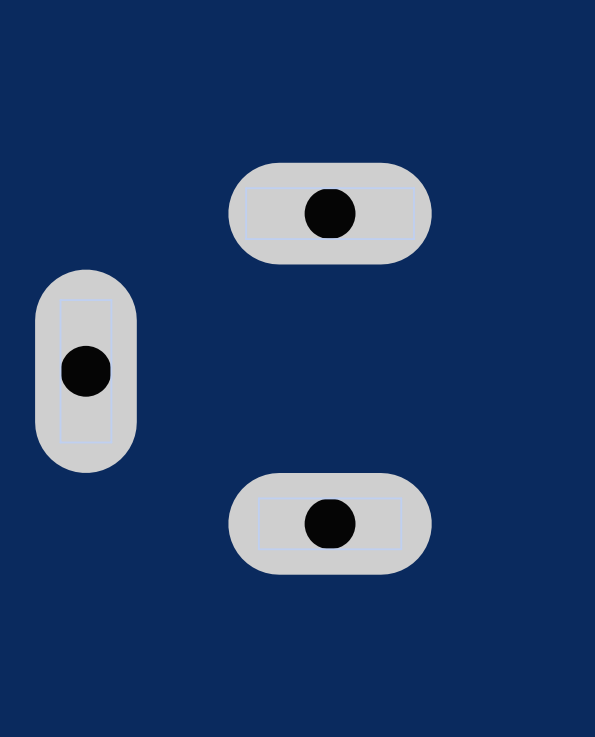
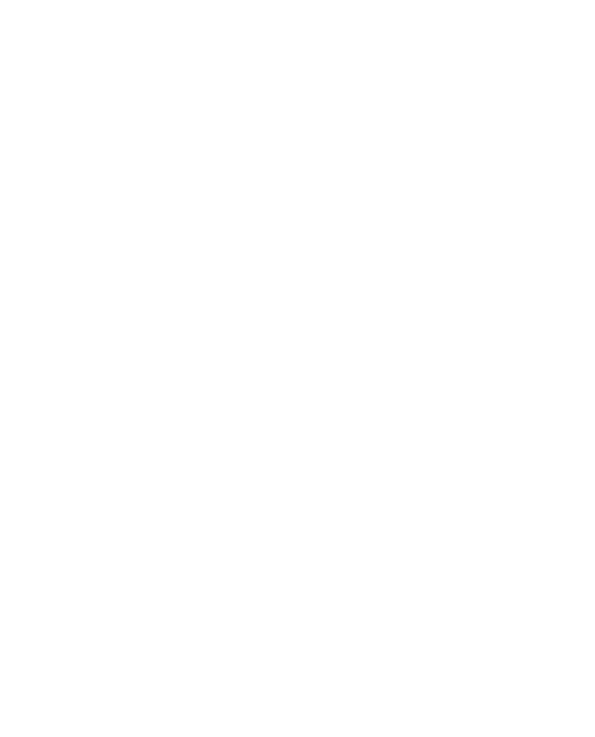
part: (233, 368) -> none

